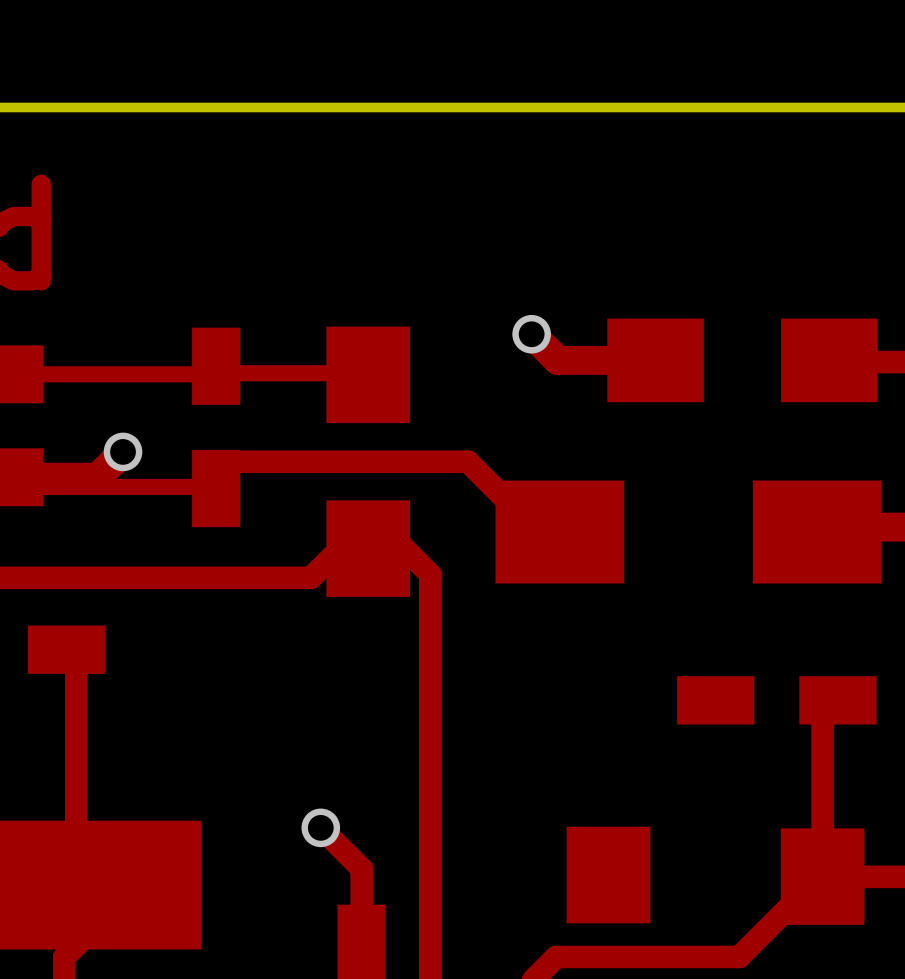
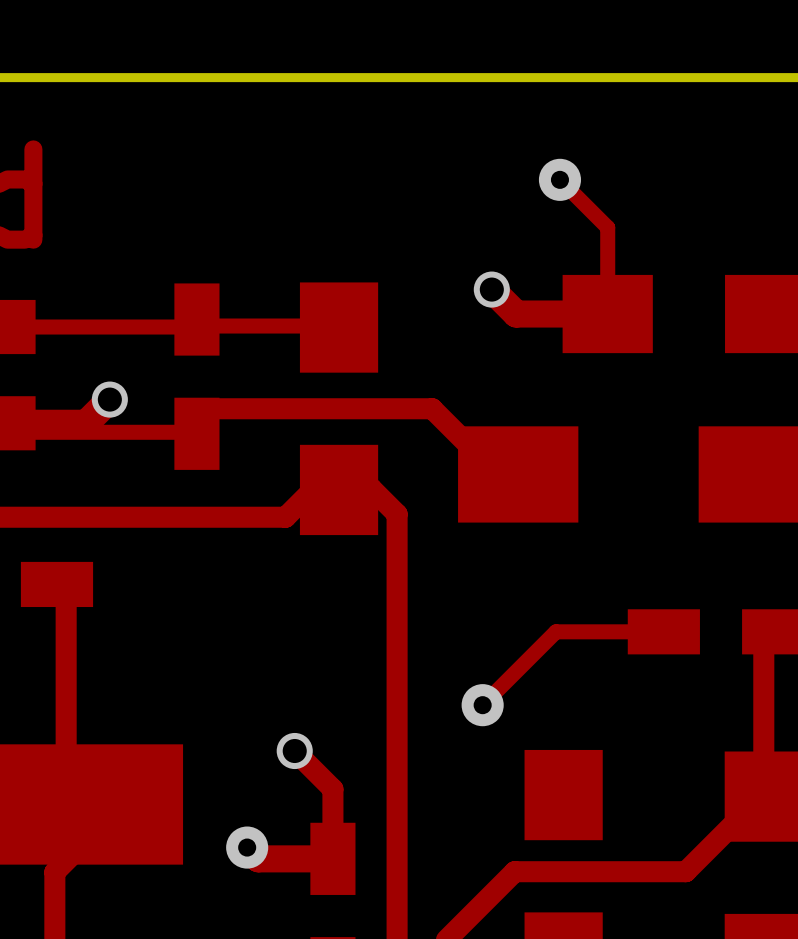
top track: none -> (559, 179) (607, 227) (607, 314)
via: none -> (559, 179)
top track: none -> (663, 631) (556, 631) (482, 705)
via: none -> (482, 705)
top track: none -> (247, 847) (258, 858) (332, 858)
via: none -> (247, 847)

